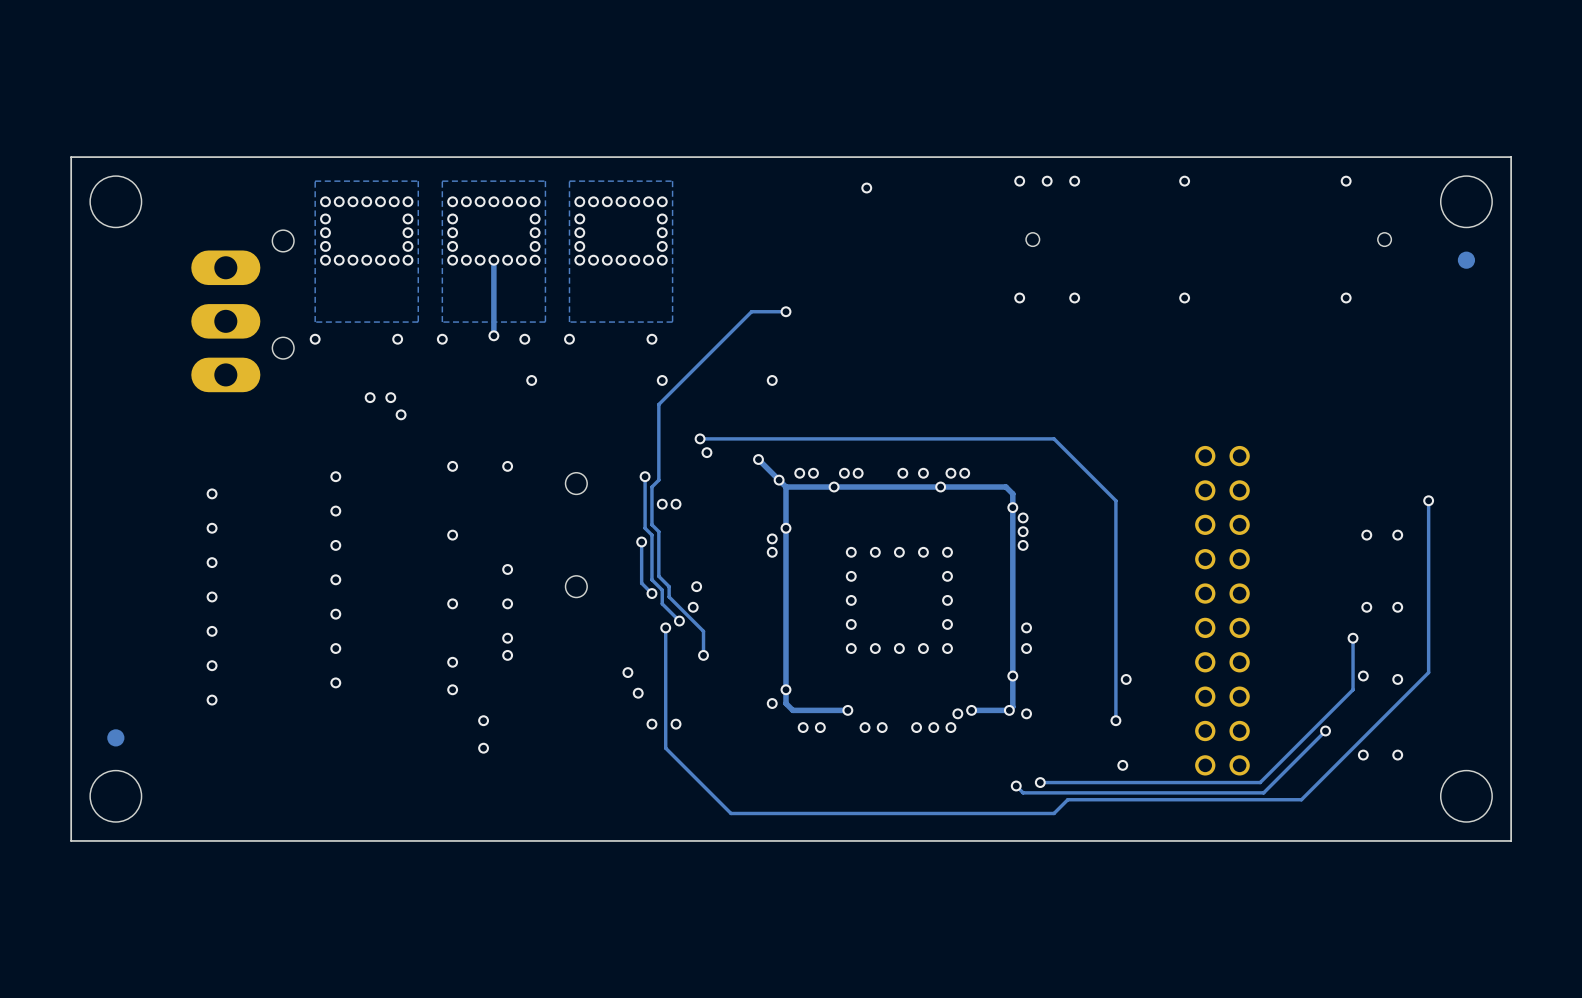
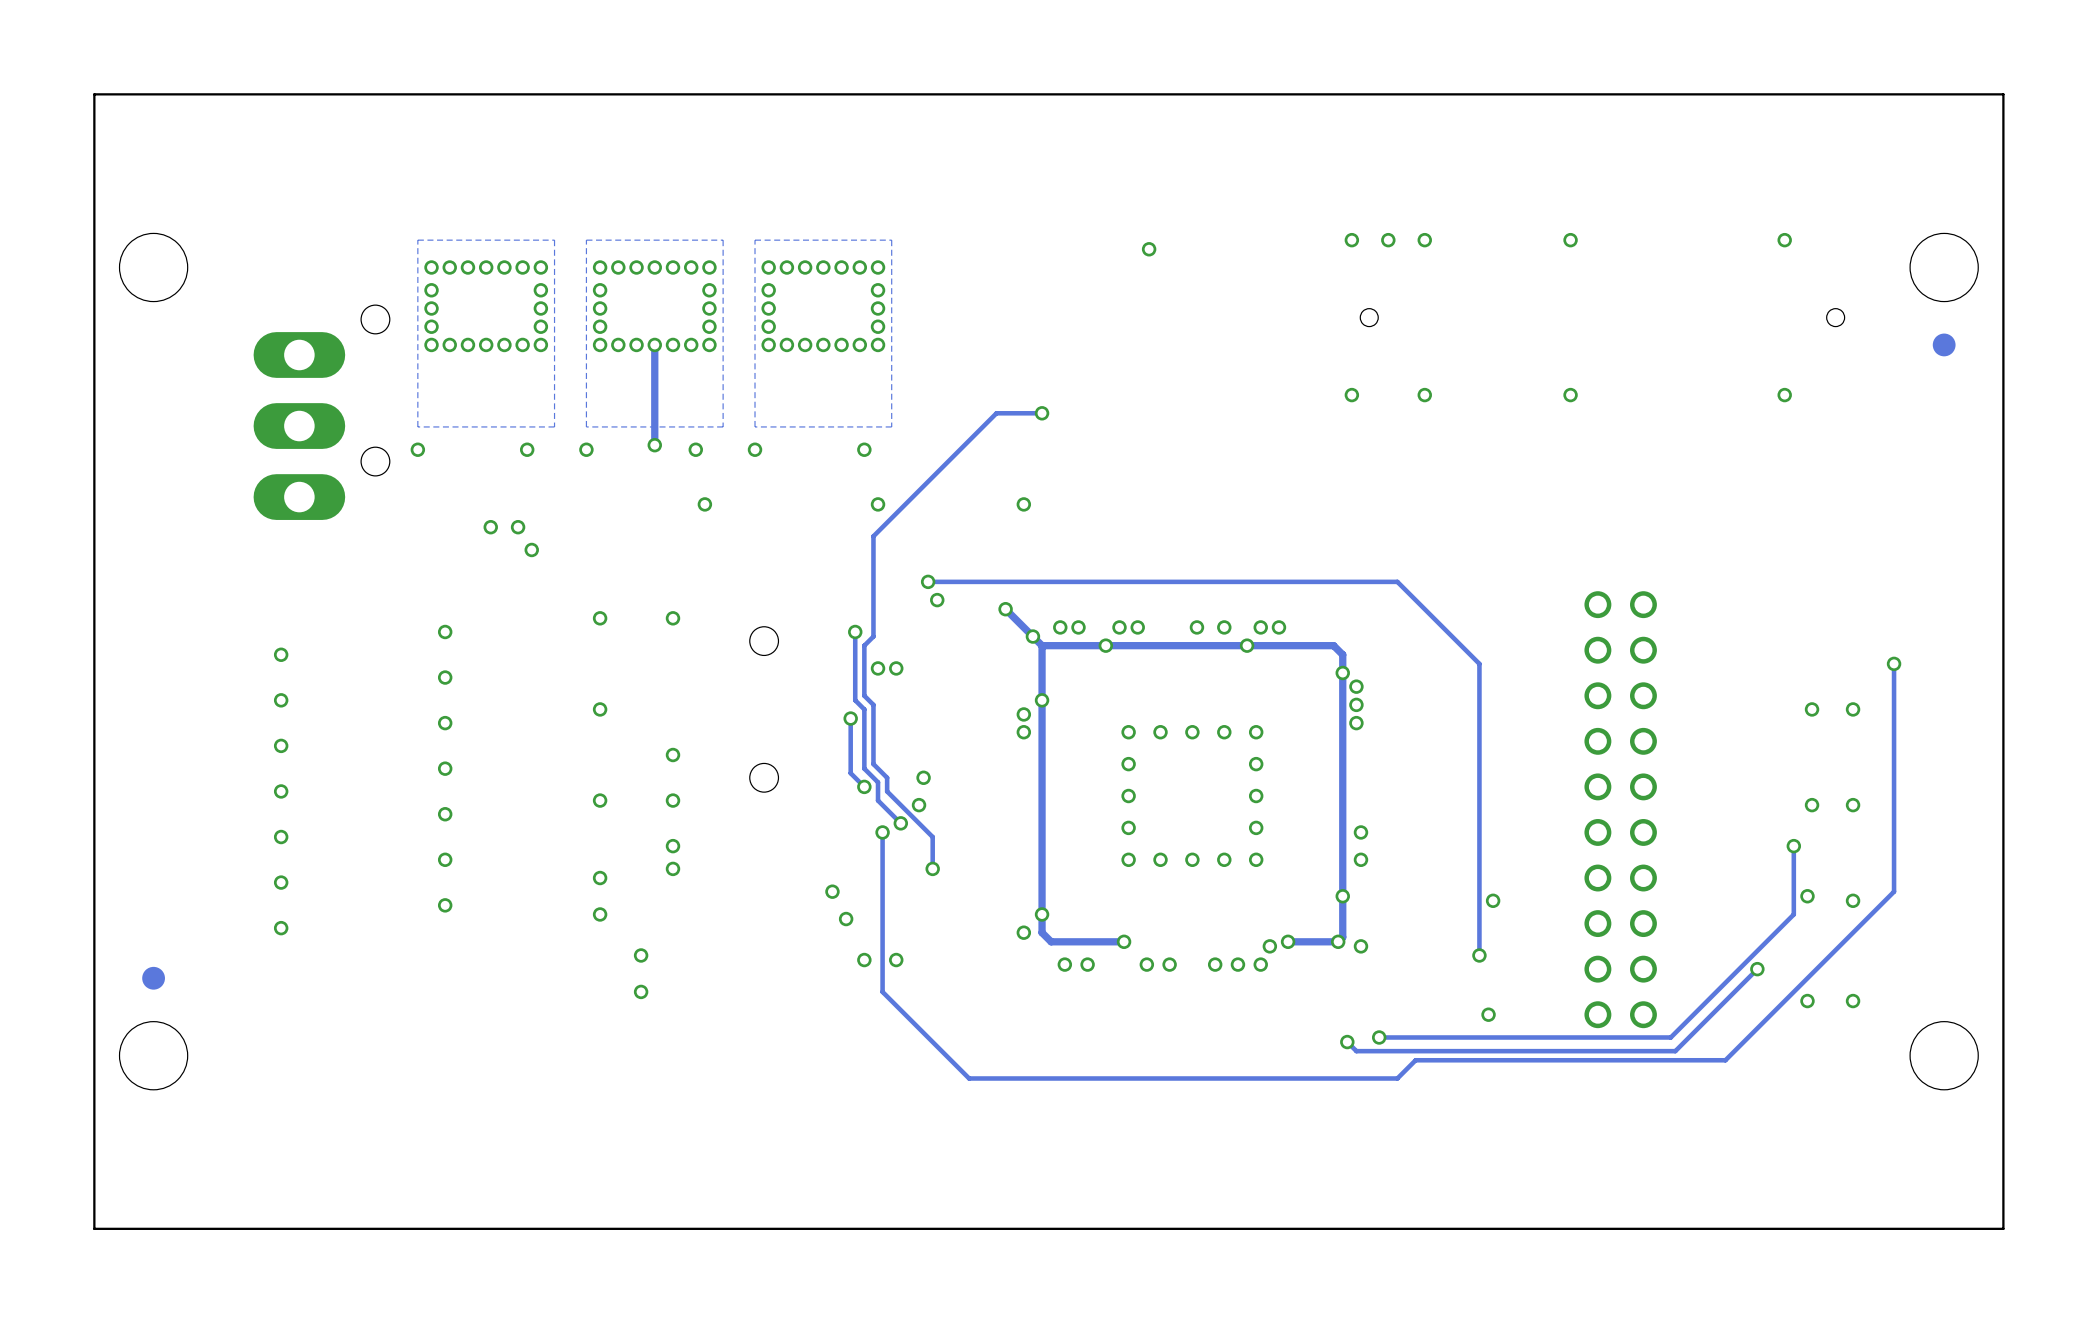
board edge: (1511, 157) (71, 157) -> (2003, 208) (2003, 94) (94, 94) (94, 208)
board edge: (1511, 840) (71, 840) -> (2003, 1114) (2003, 1228) (94, 1228) (94, 1114)

